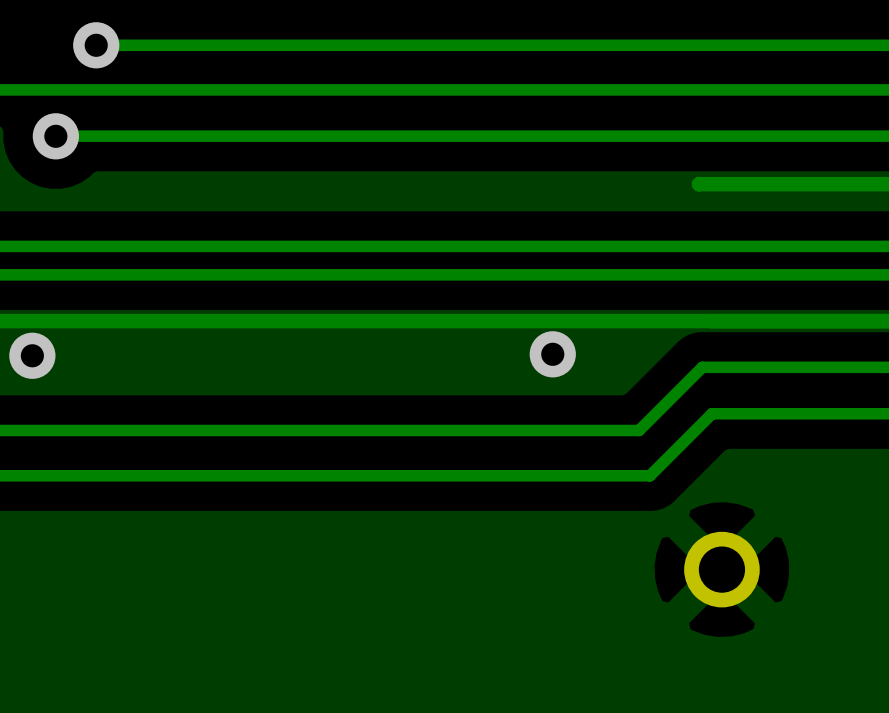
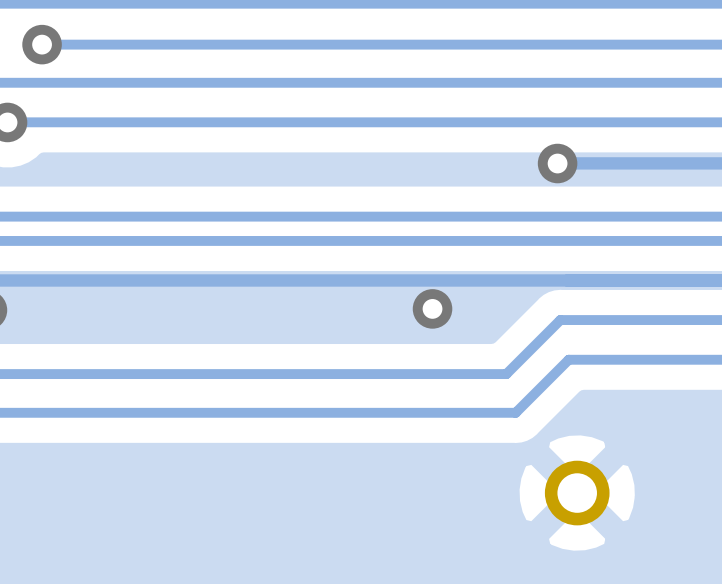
via: none -> (557, 163)

